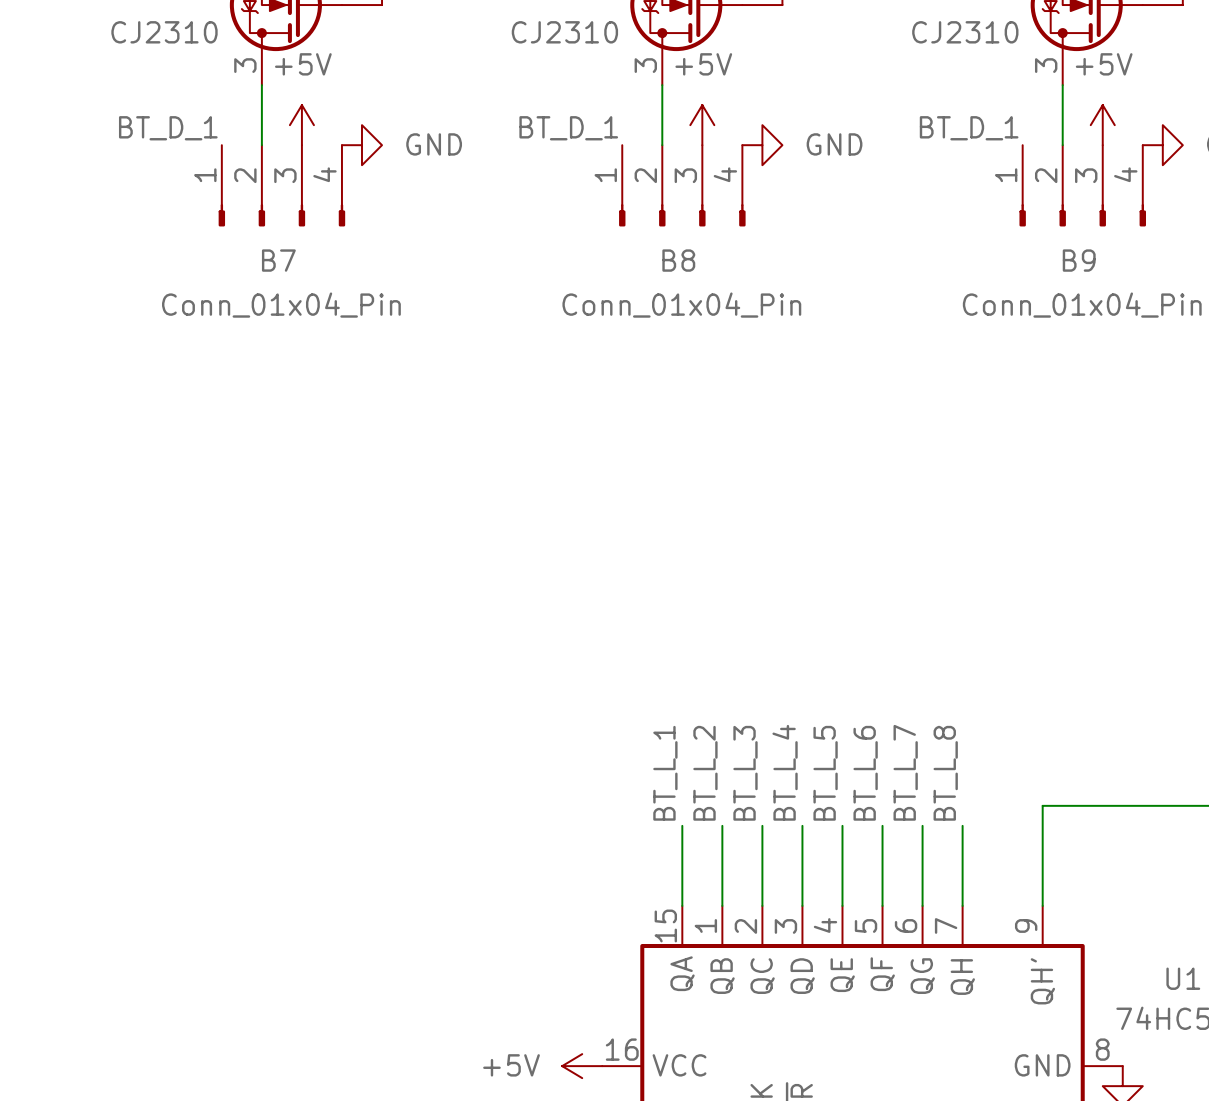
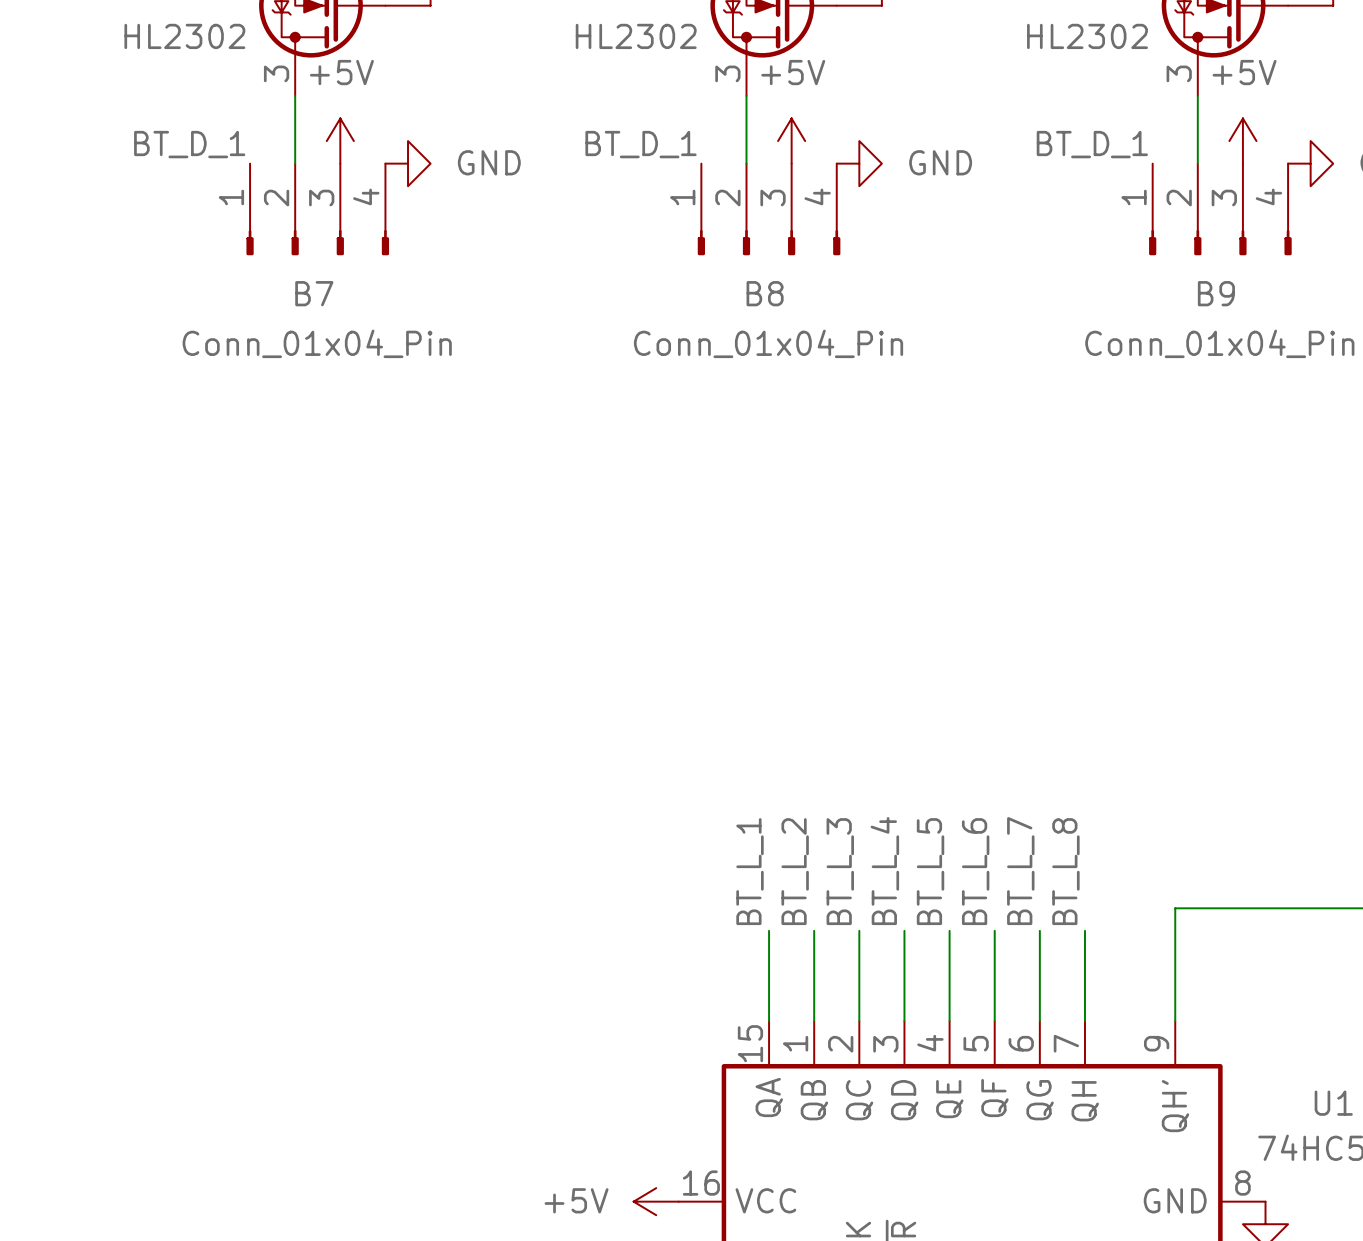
part value: CJ2310 (164, 32) -> HL2302 (184, 36)
part value: CJ2310 (564, 32) -> HL2302 (636, 36)
part value: CJ2310 (965, 32) -> HL2302 (1087, 36)

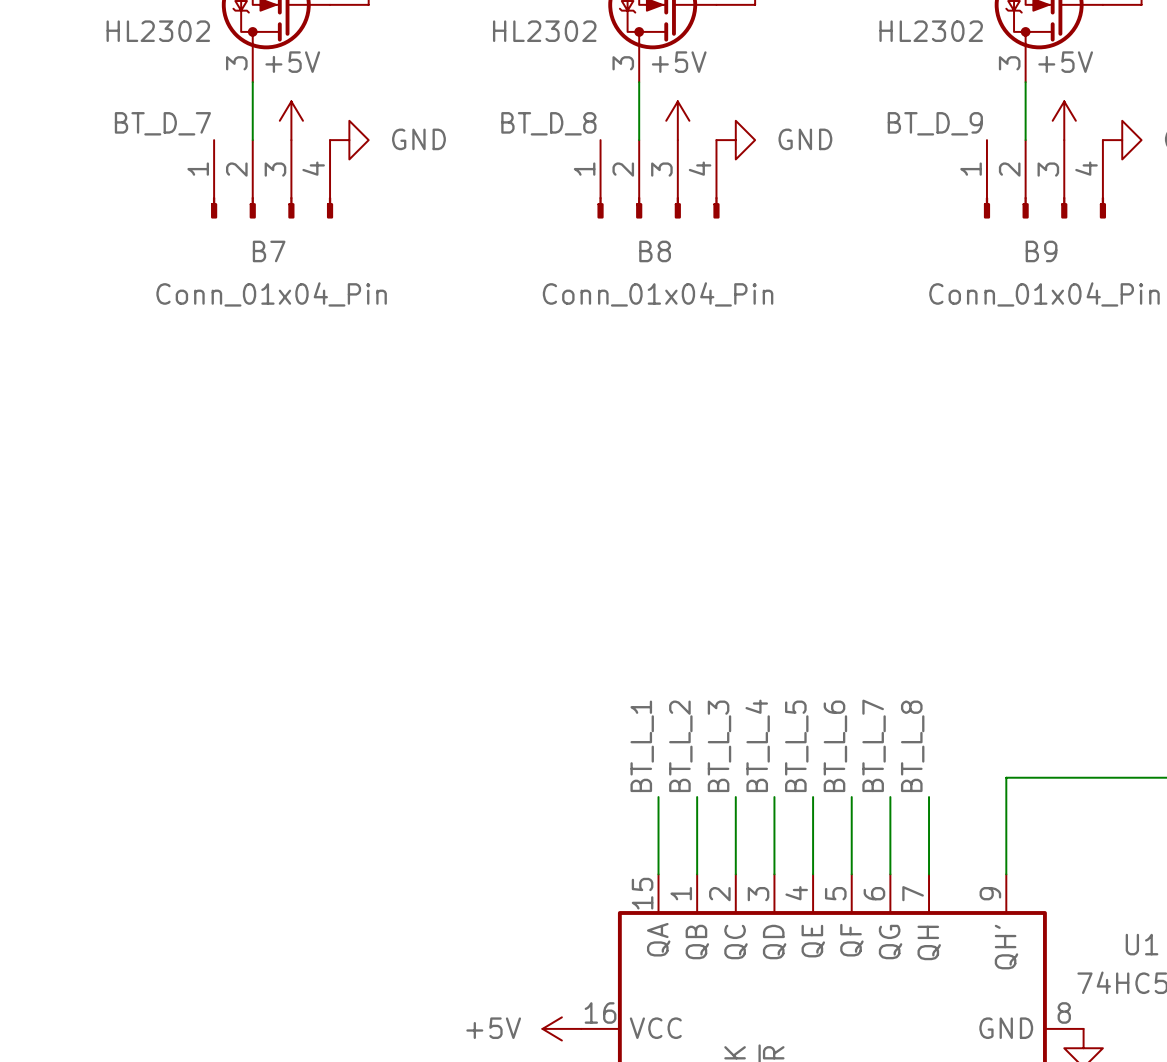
label: BT_D_1 (189, 144) -> BT_D_7 (162, 123)
label: BT_D_1 (641, 144) -> BT_D_8 (548, 123)
label: BT_D_1 (1092, 144) -> BT_D_9 (935, 123)

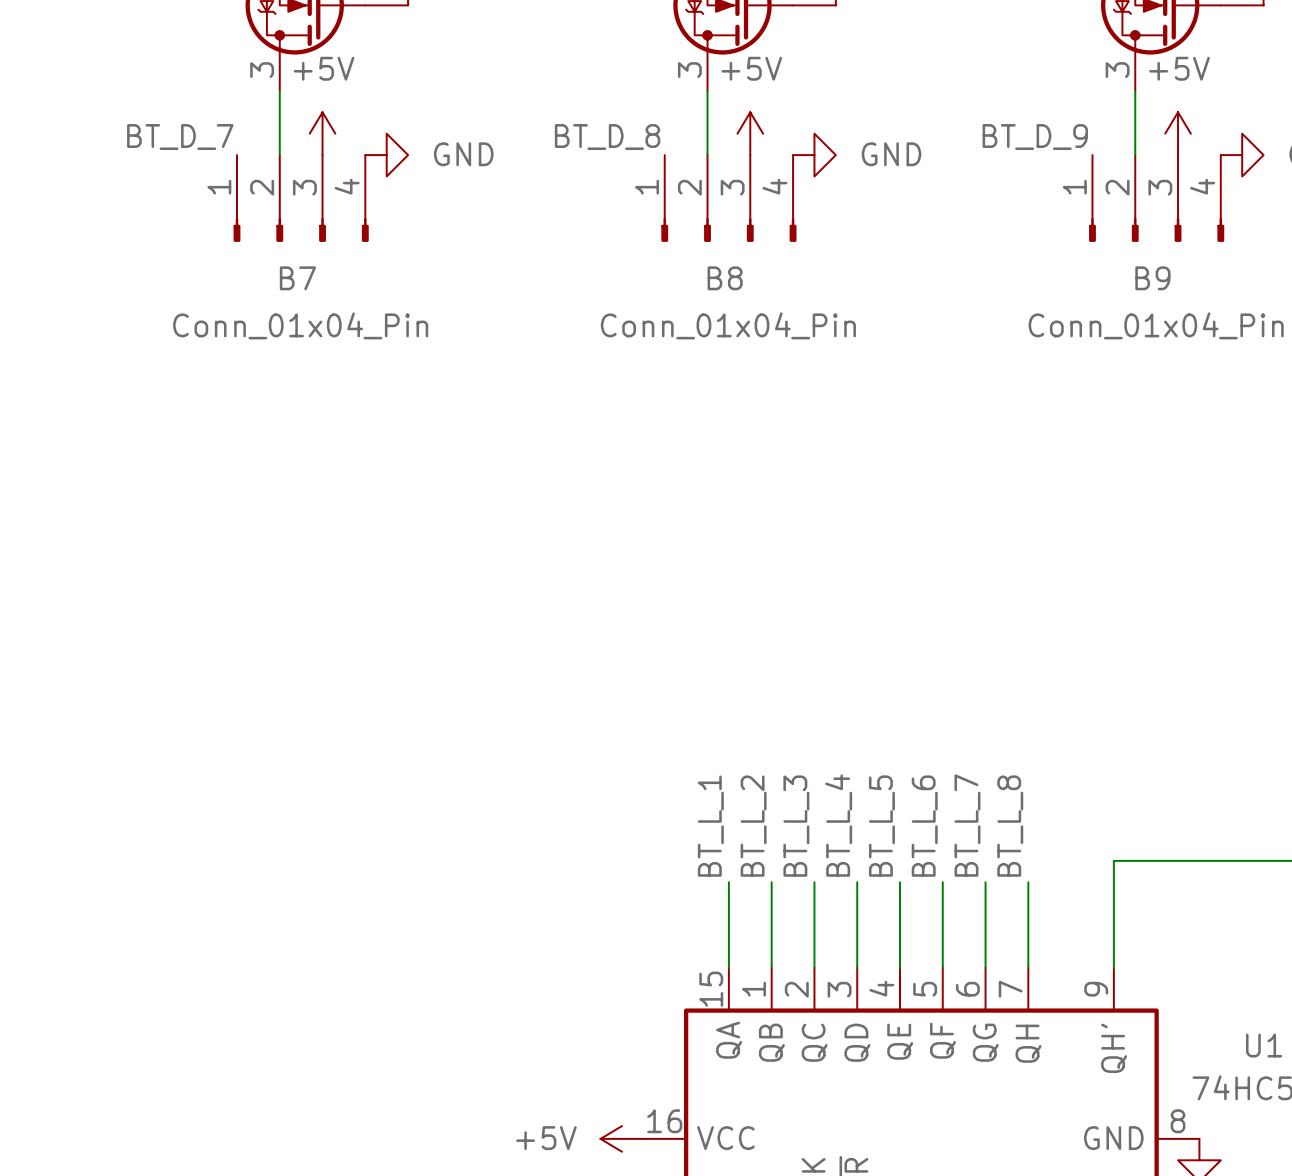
part value: HL2302 (158, 31) -> none
part value: HL2302 (544, 31) -> none
part value: HL2302 (931, 31) -> none

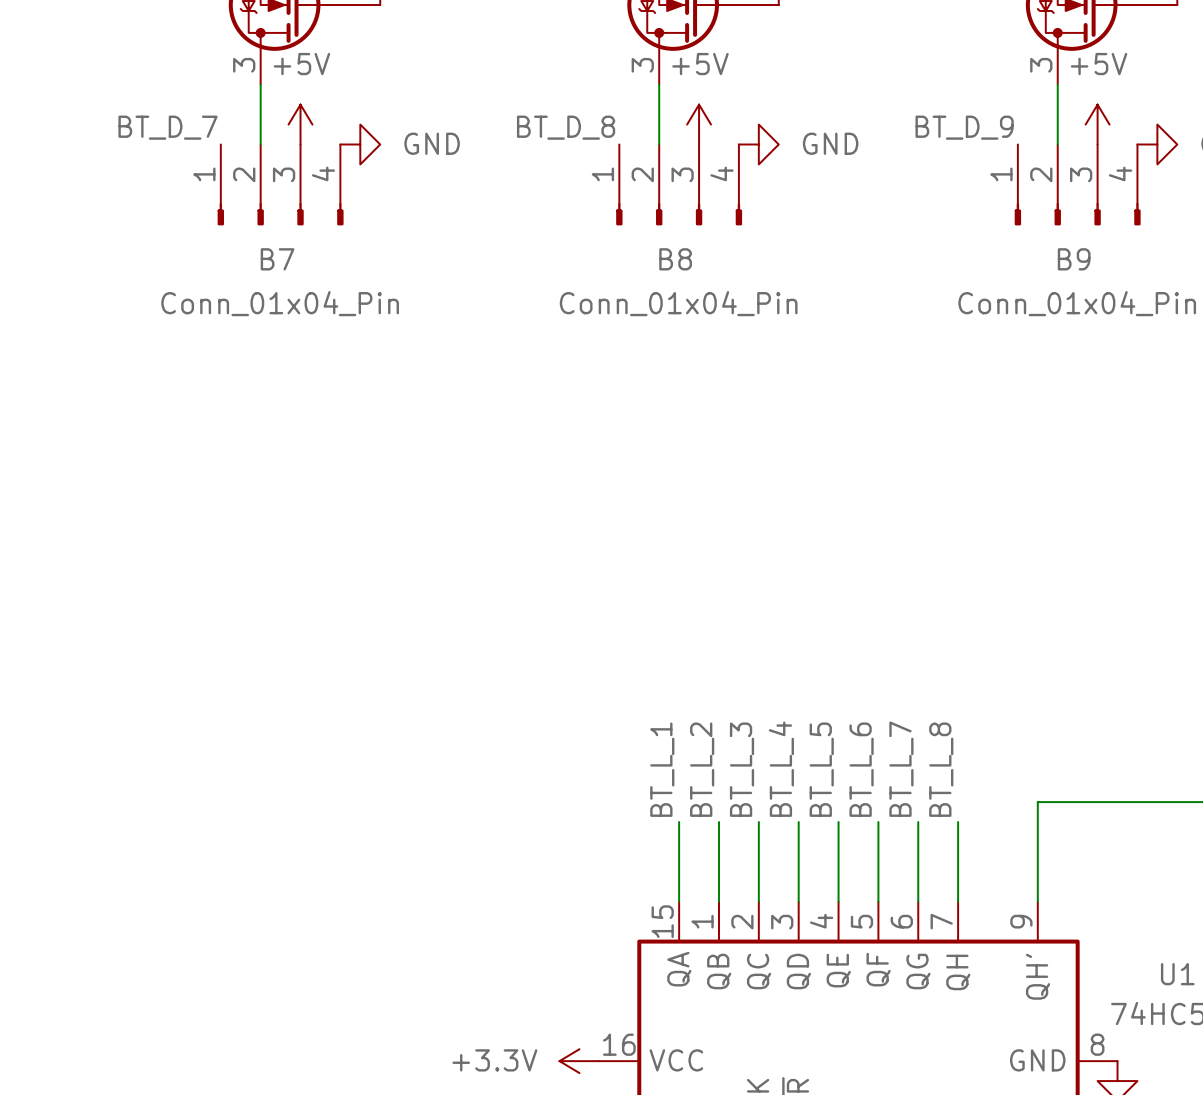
power symbol: +5V (621, 1138) -> +3.3V (579, 1061)

